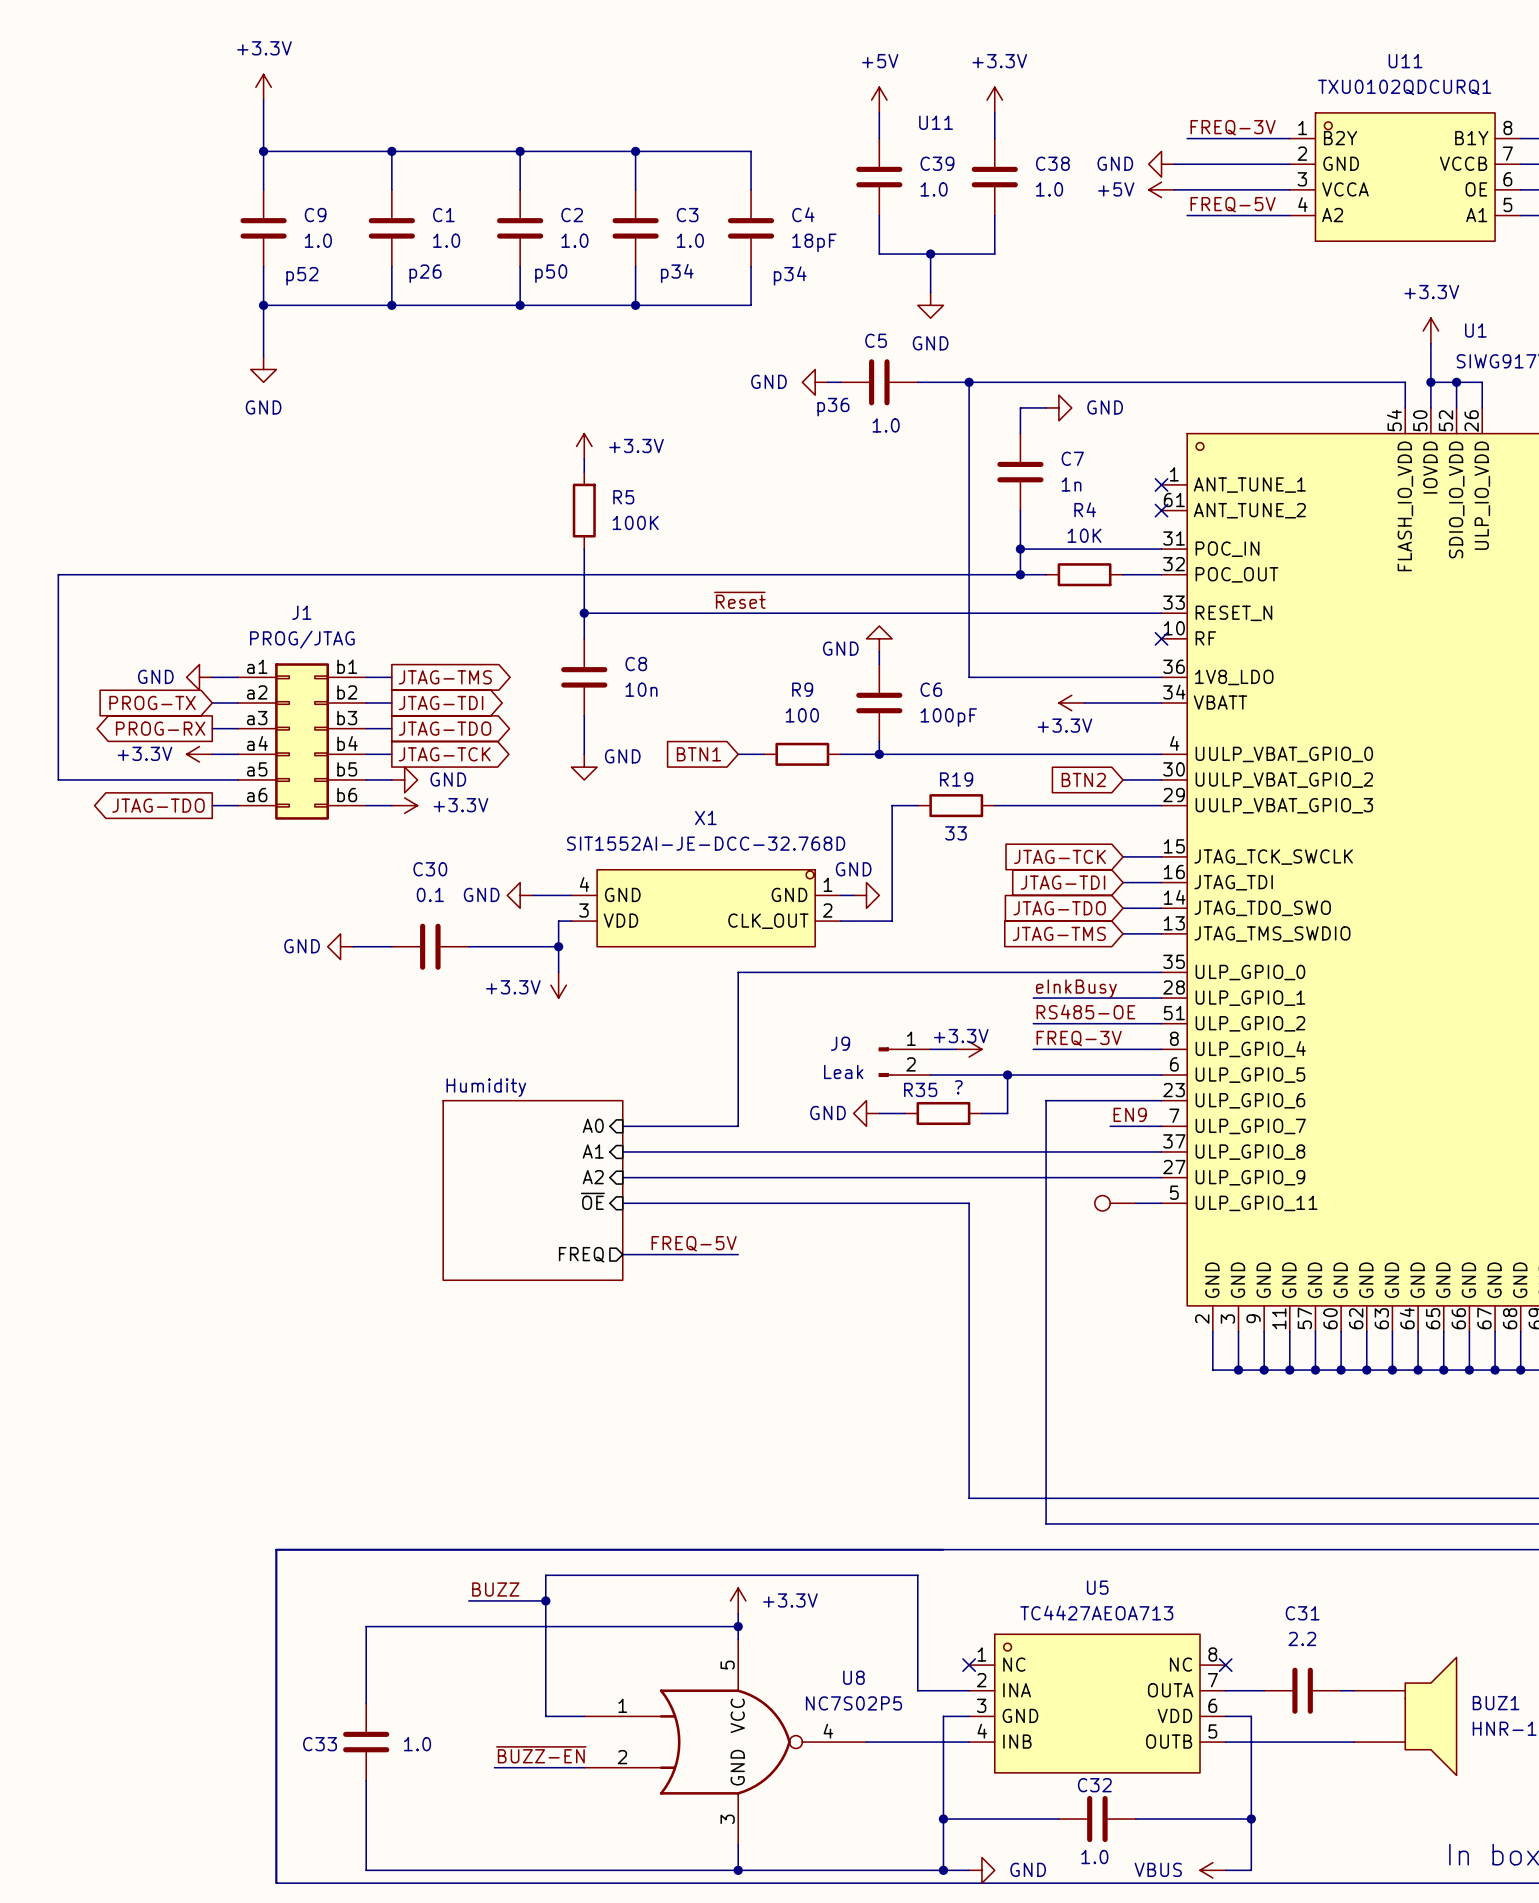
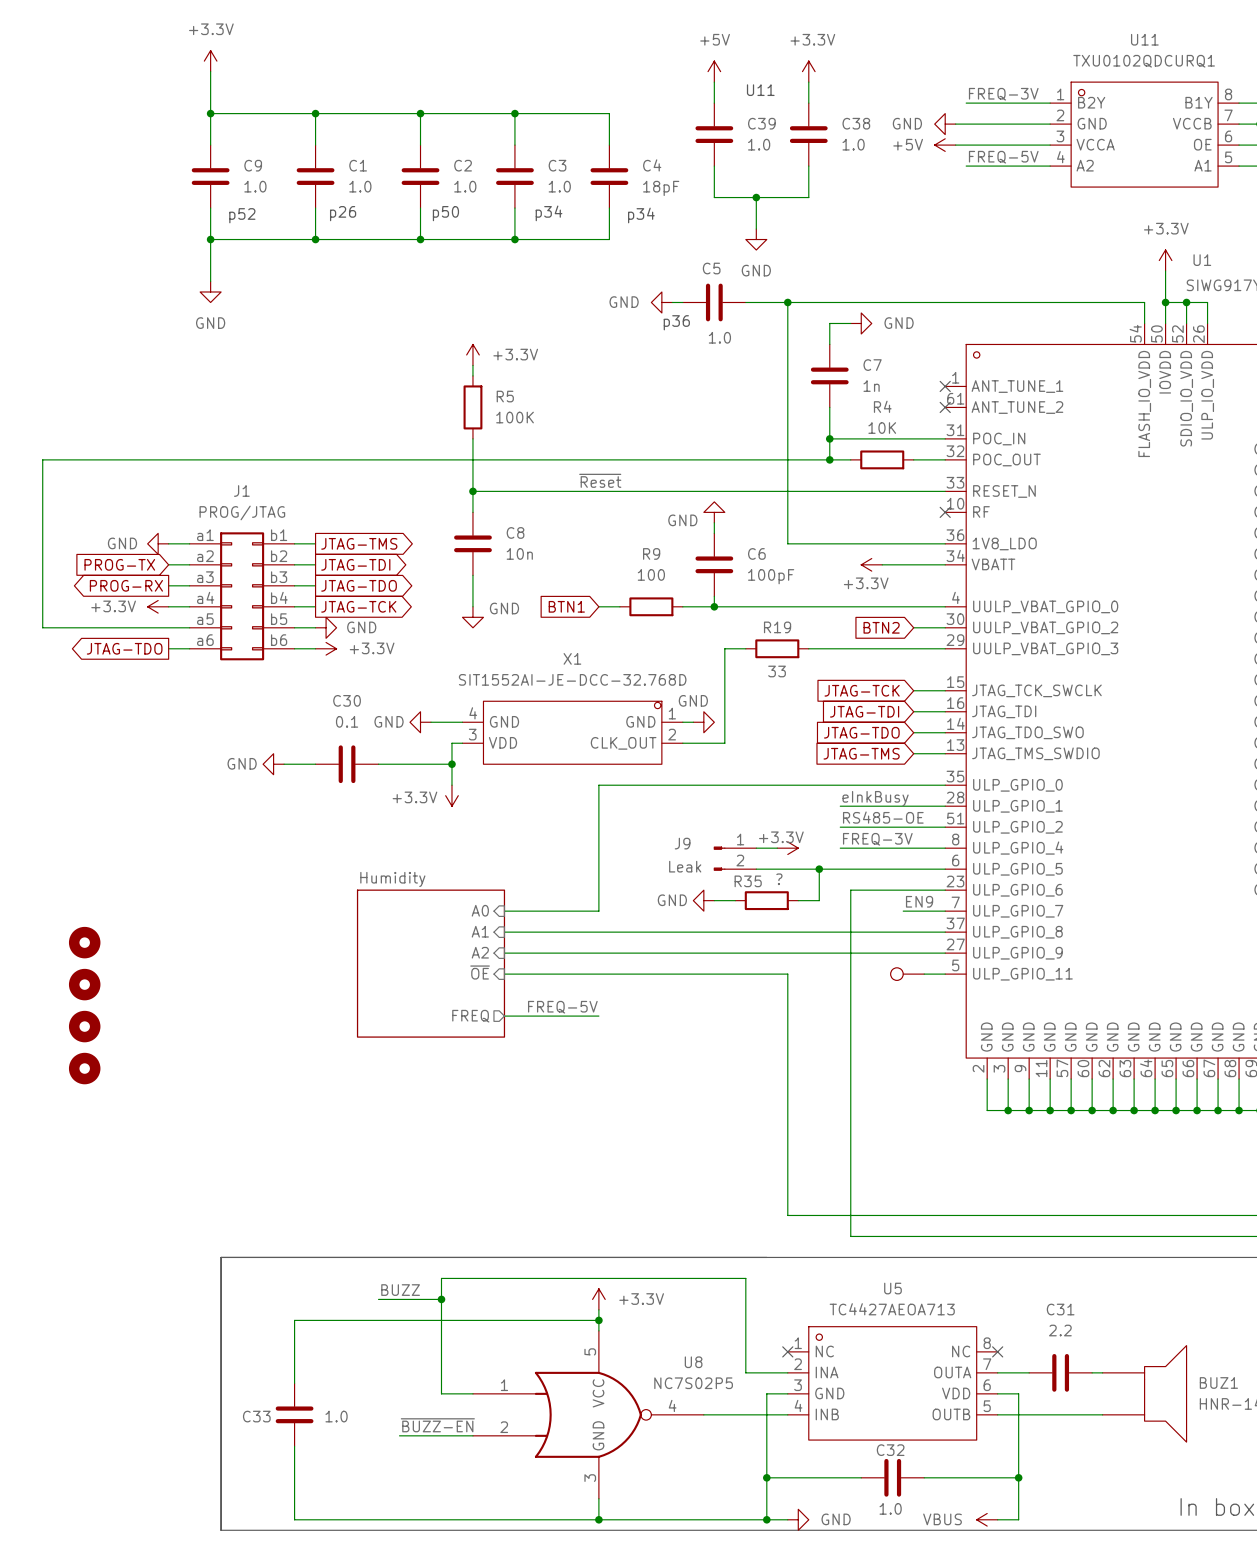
part: none -> (84, 942)
part: none -> (84, 984)
part: none -> (84, 1026)
part: none -> (84, 1068)

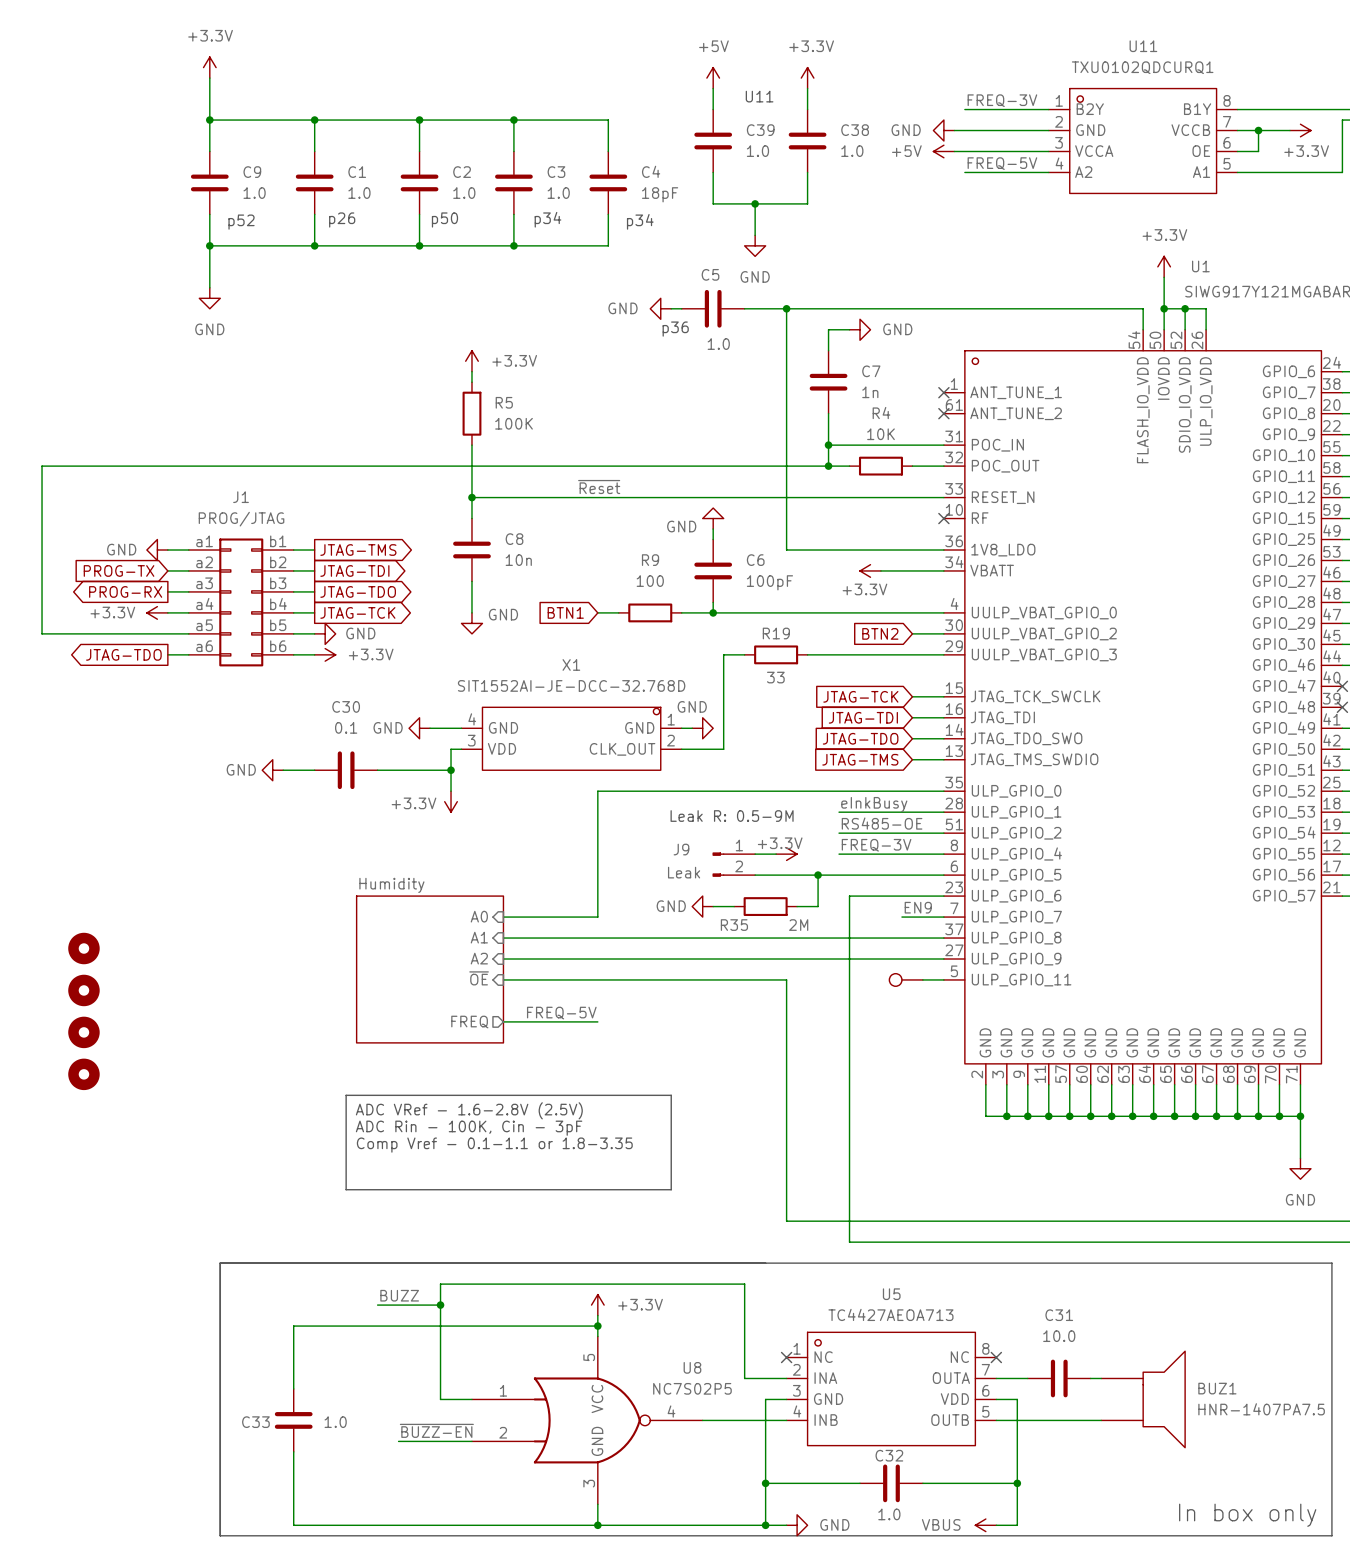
text: none -> Leak R: 0.5-9M (732, 816)
R35 value: ? (779, 879) -> 2M (798, 925)
R35 name position: R35 (748, 881) -> R35 (734, 925)
line: none -> (346, 1095) (671, 1095) (671, 1189) (346, 1189) (346, 1095)
text: none -> ADC VRef - 1.6-2.8V (2.5V) (469, 1110)
text: none -> ADC Rin - 100K, Cin - 3pF (469, 1128)
text: none -> Comp Vref - 0.1-1.1 or 1.8-3.35 (494, 1145)
C31 value: 2.2 (1060, 1330) -> 10.0 (1059, 1336)

